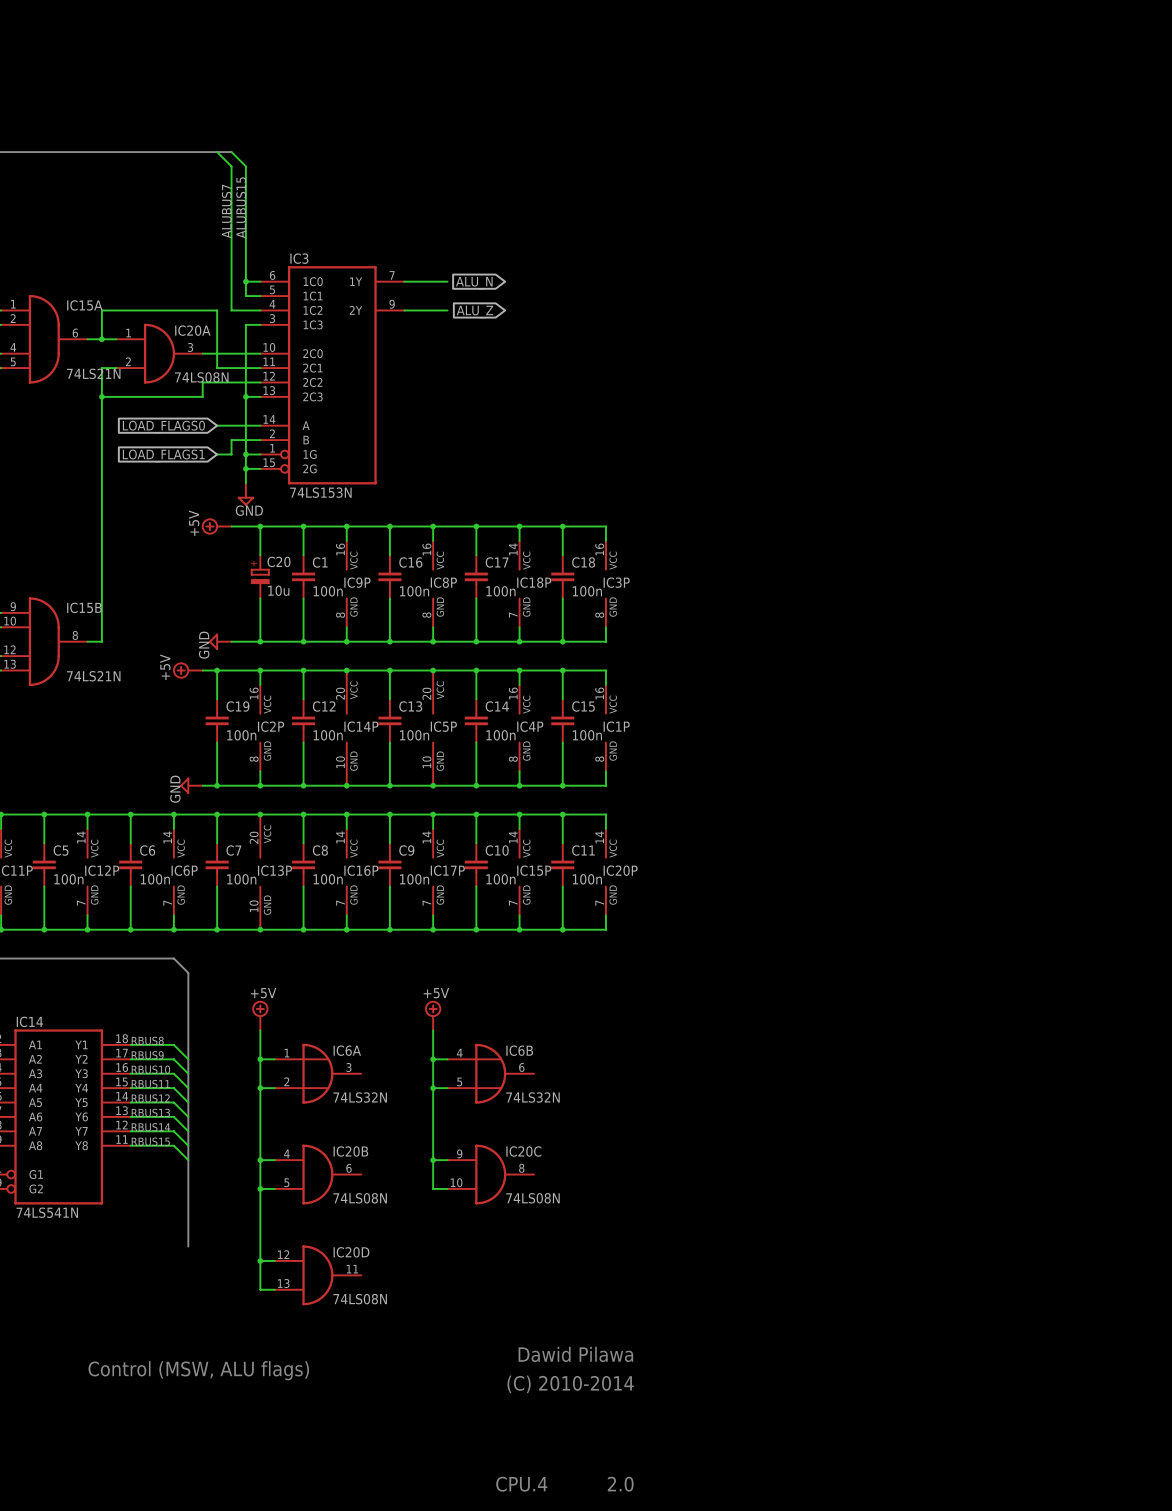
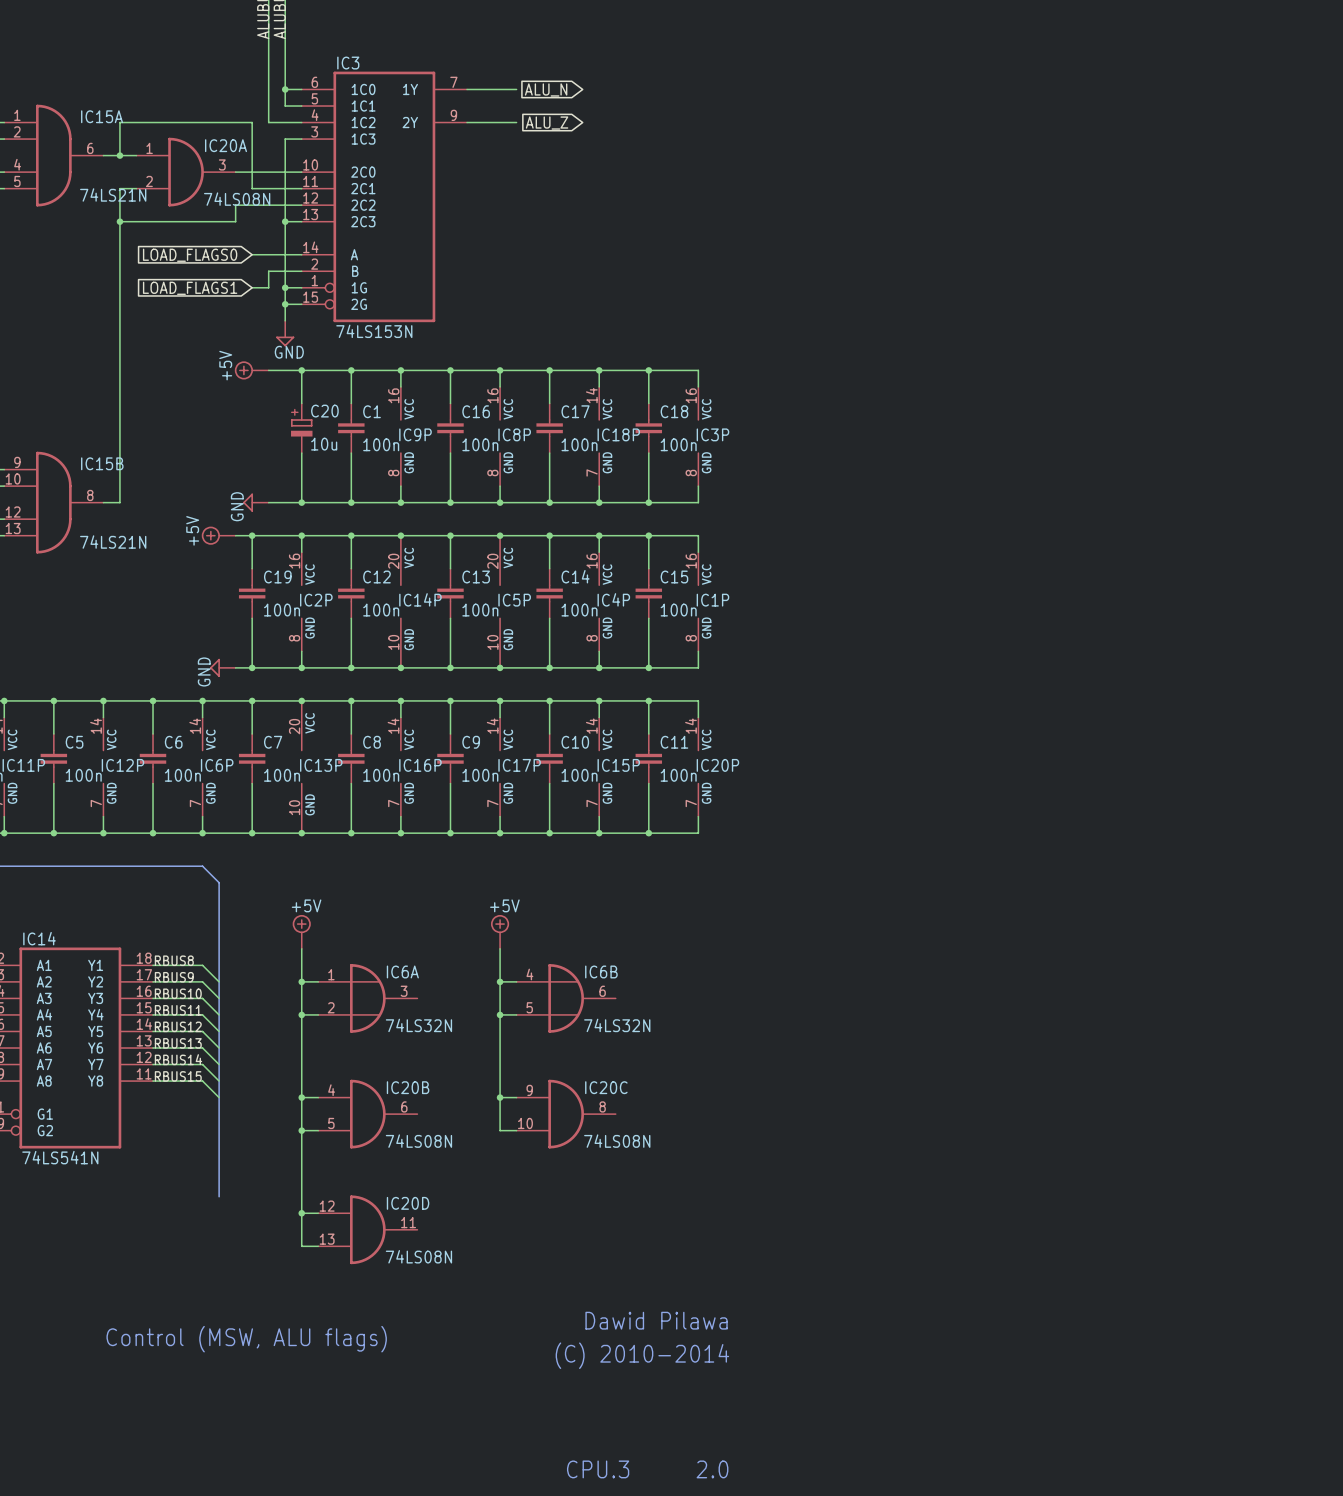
text: CPU.4 (521, 1484) -> CPU.3 (598, 1469)

